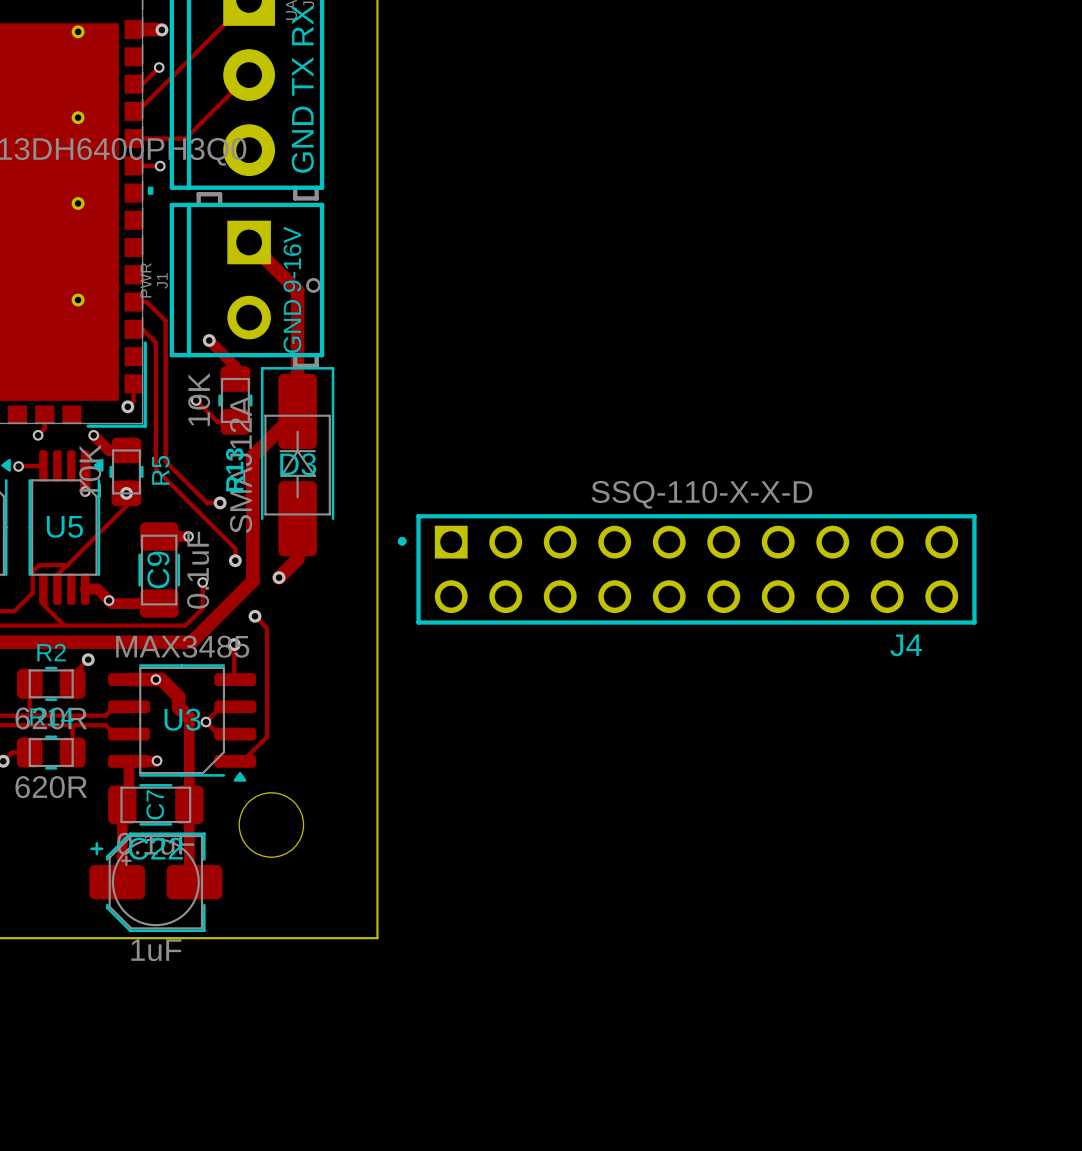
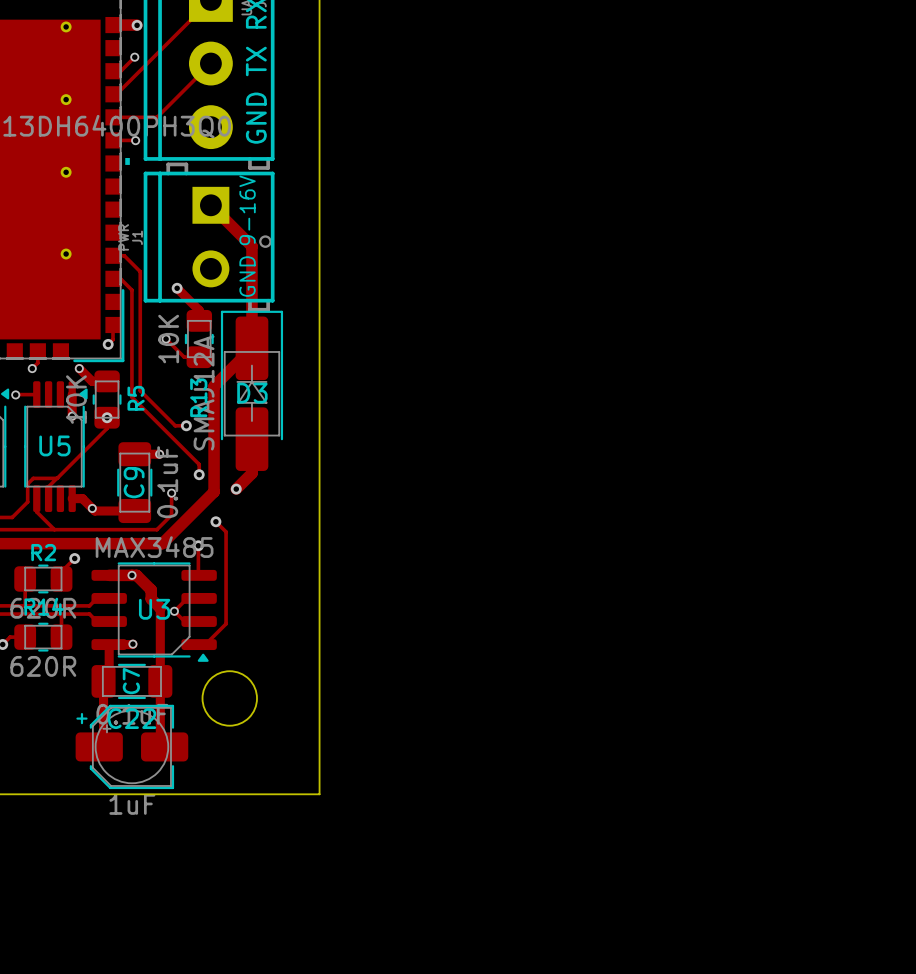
J4: SSQ-110-X-X-D (687, 569) -> none

